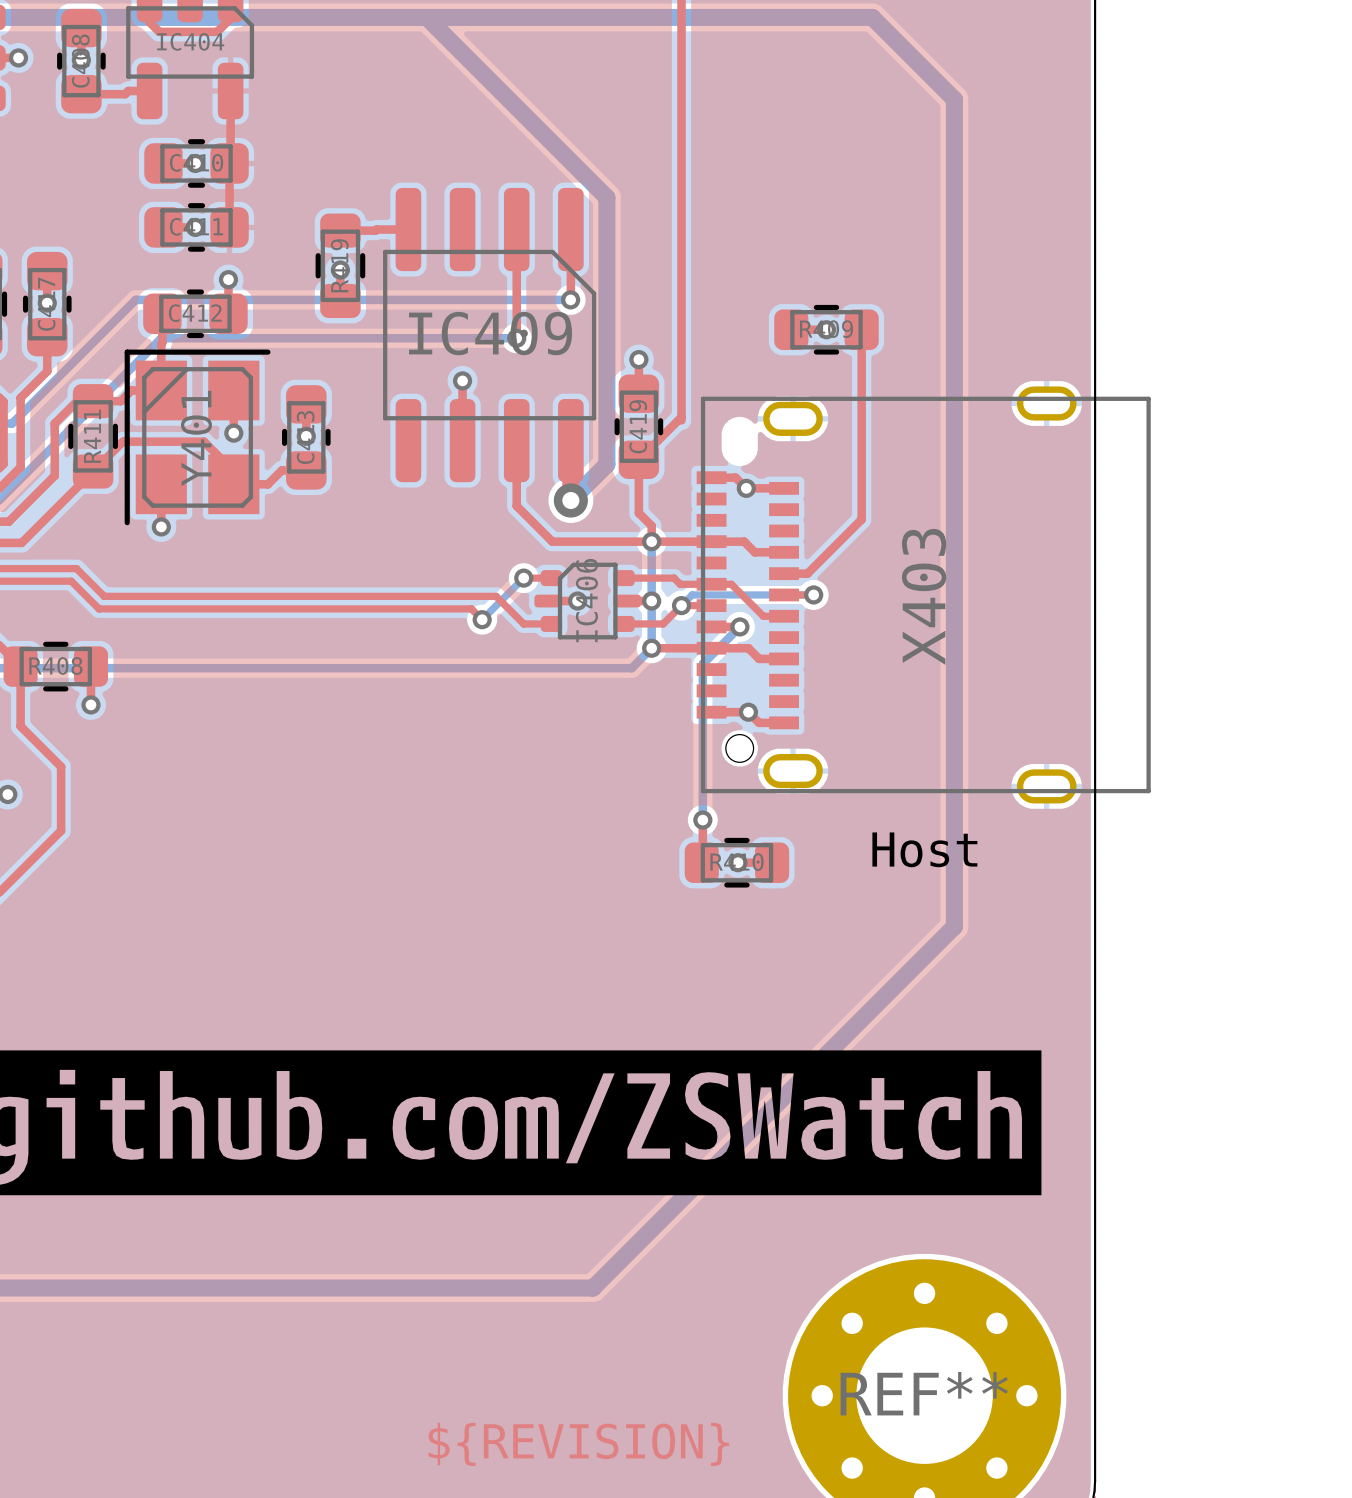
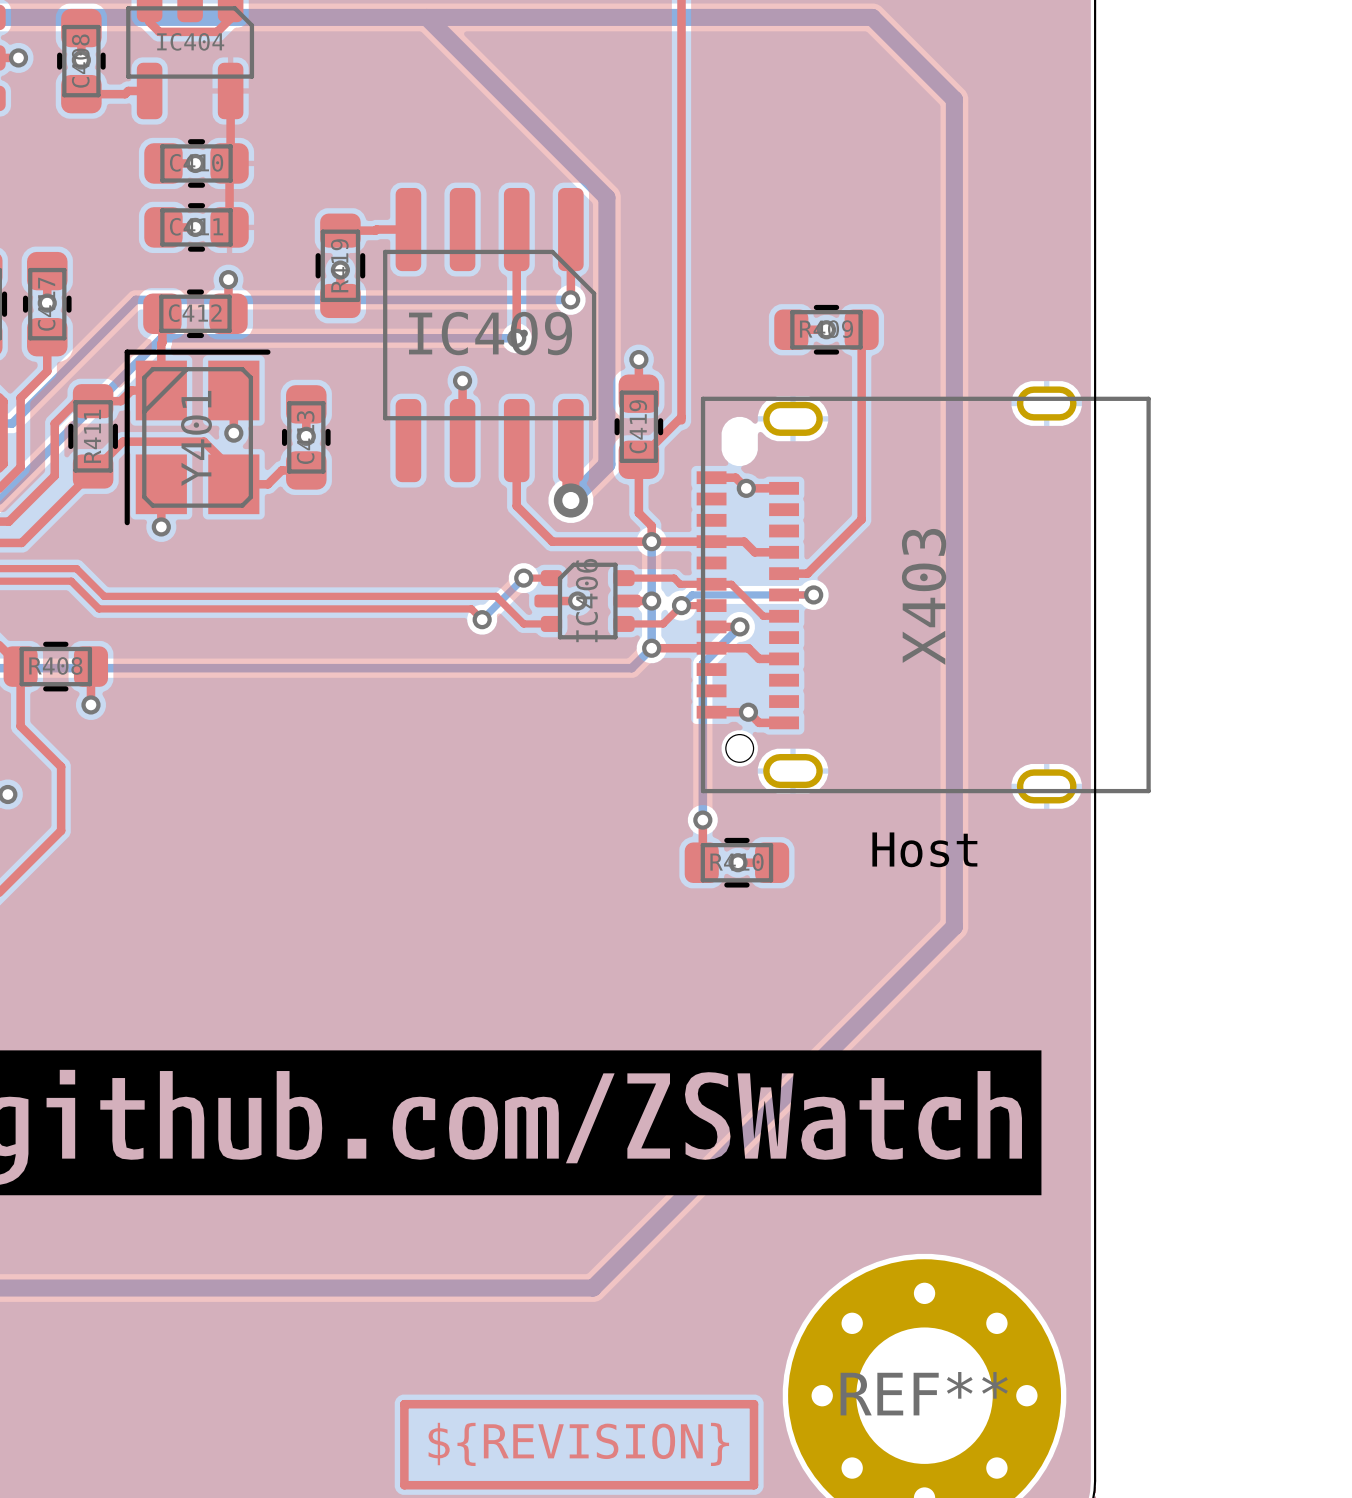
top track: none -> (404, 1404) (753, 1404) (753, 1485) (404, 1485) (404, 1404)

